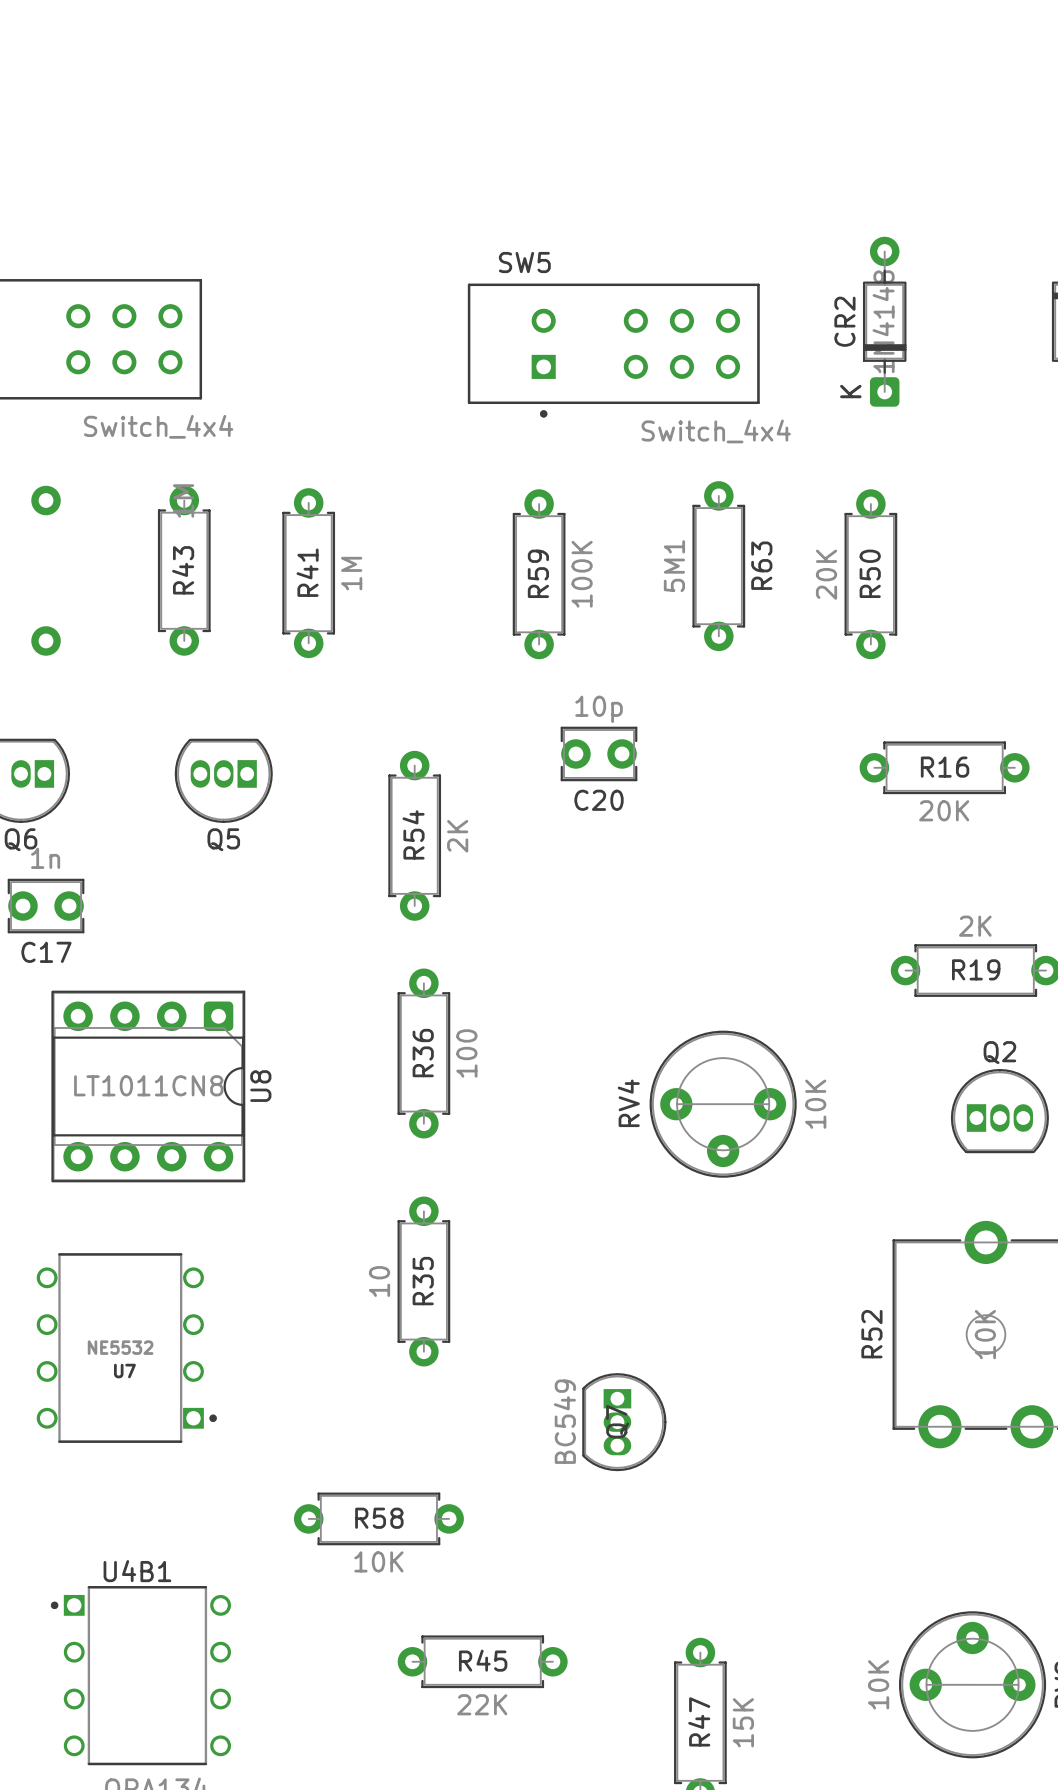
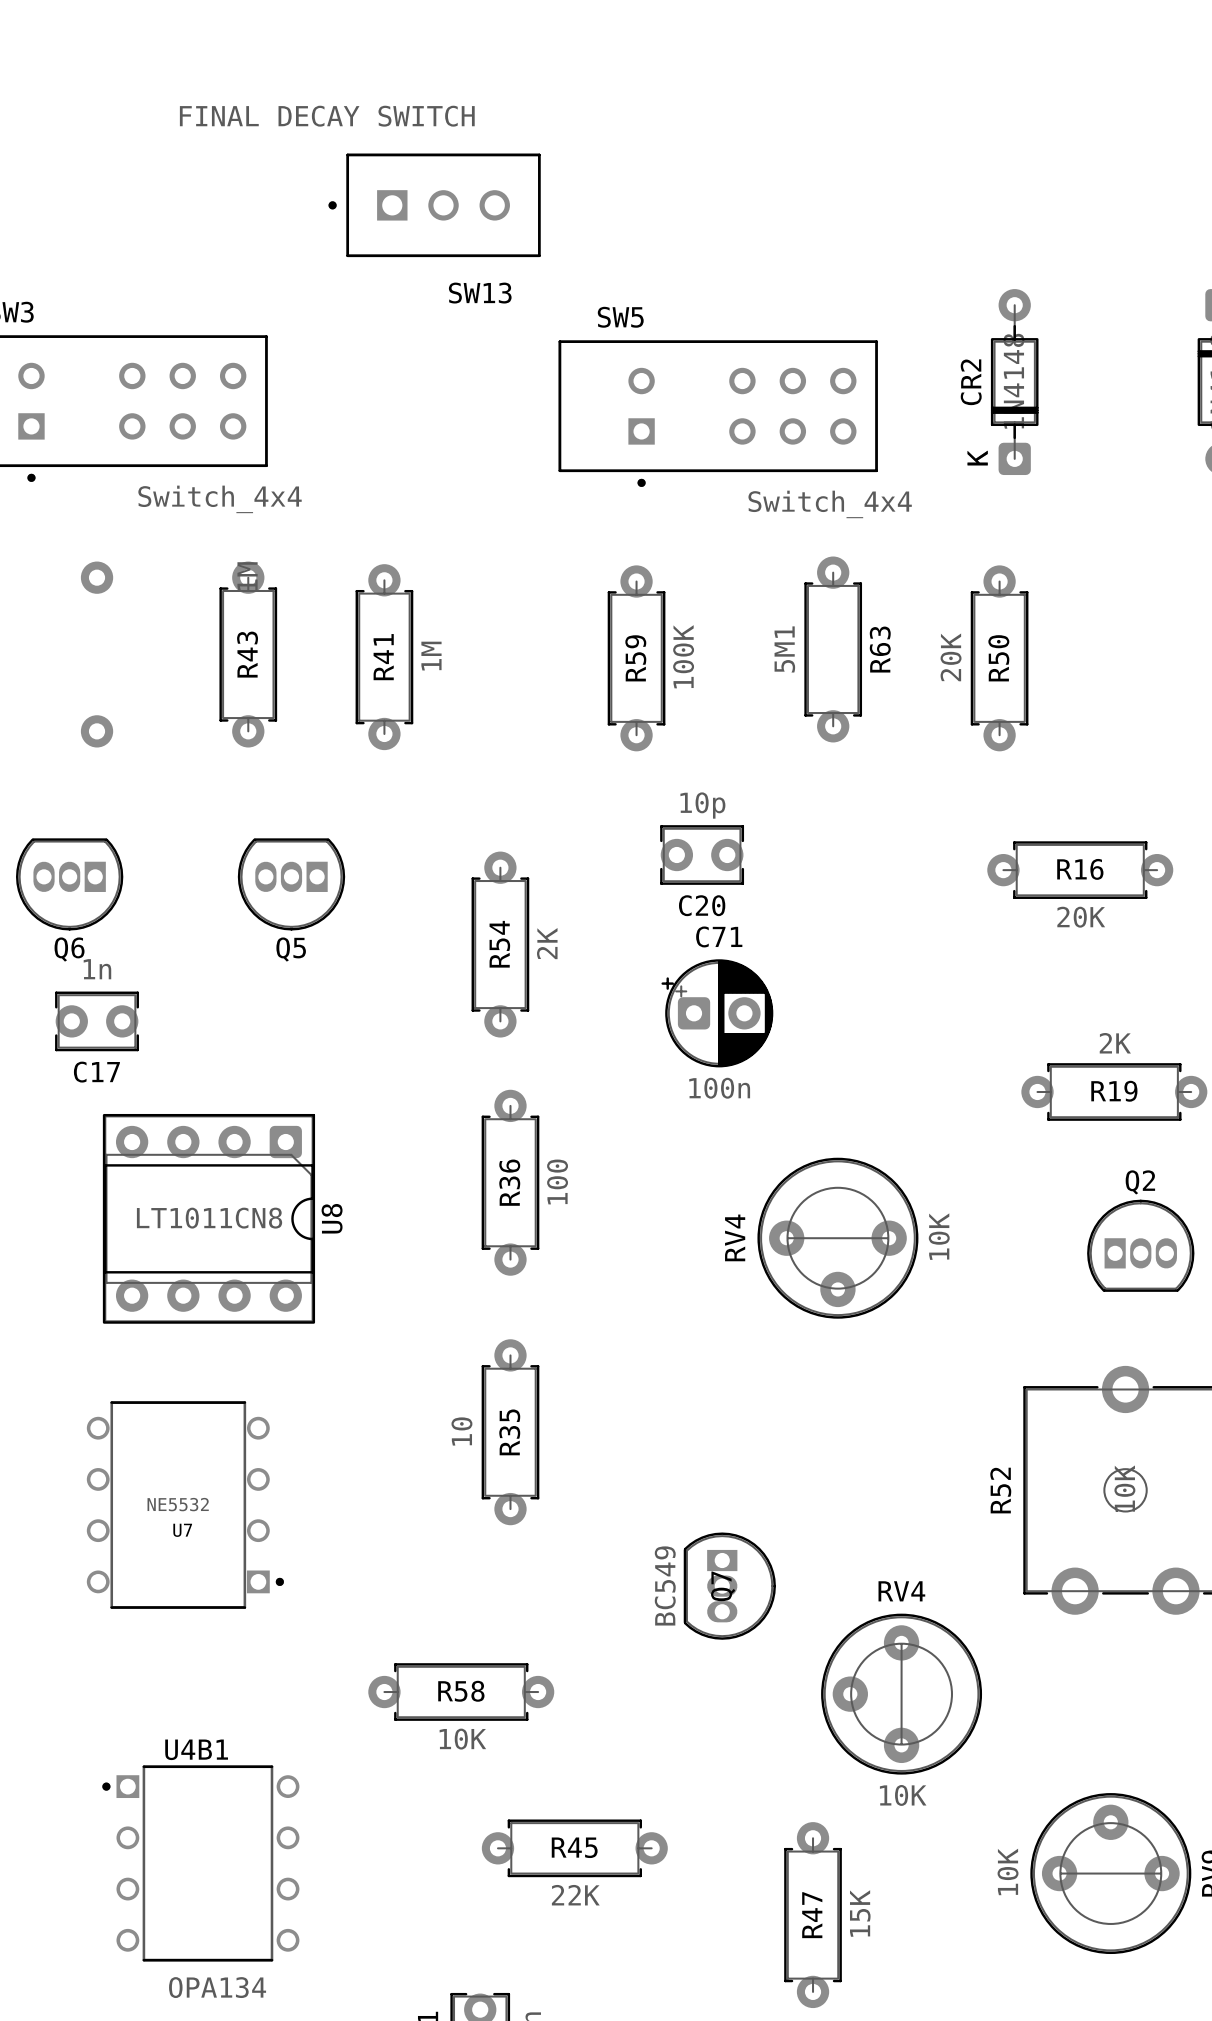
SW13: none -> FINAL DECAY SWITCH (434, 205)
C71: none -> 100n (717, 1013)
RV4: none -> 10K (901, 1694)

